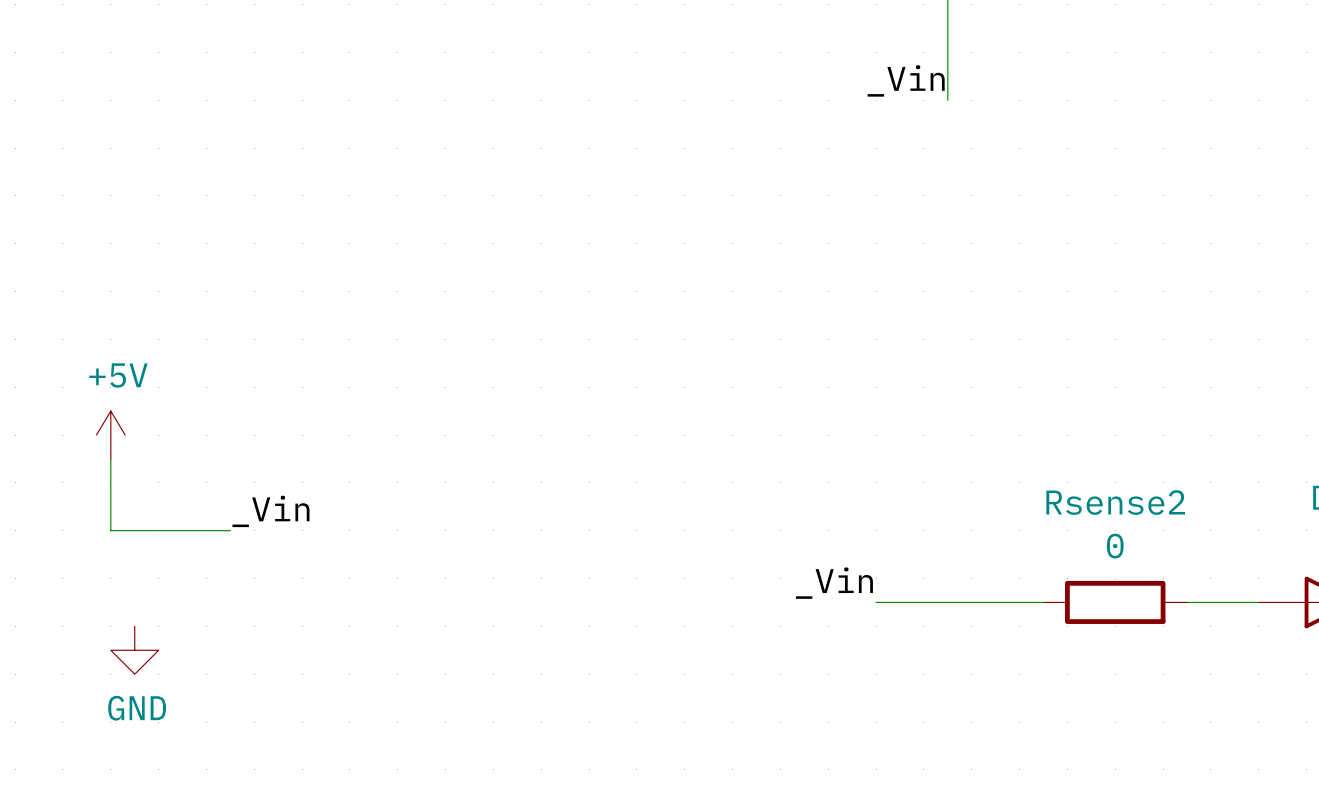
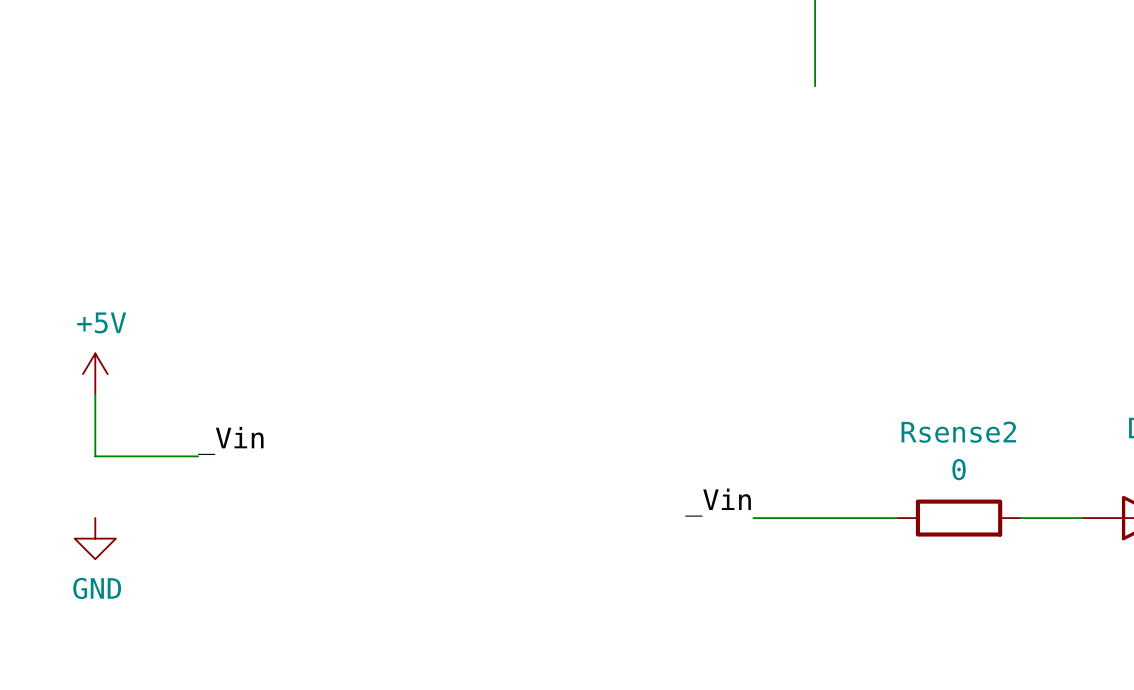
label: _Vin (906, 80) -> none
power symbol position: GND (134, 650) -> GND (95, 538)

